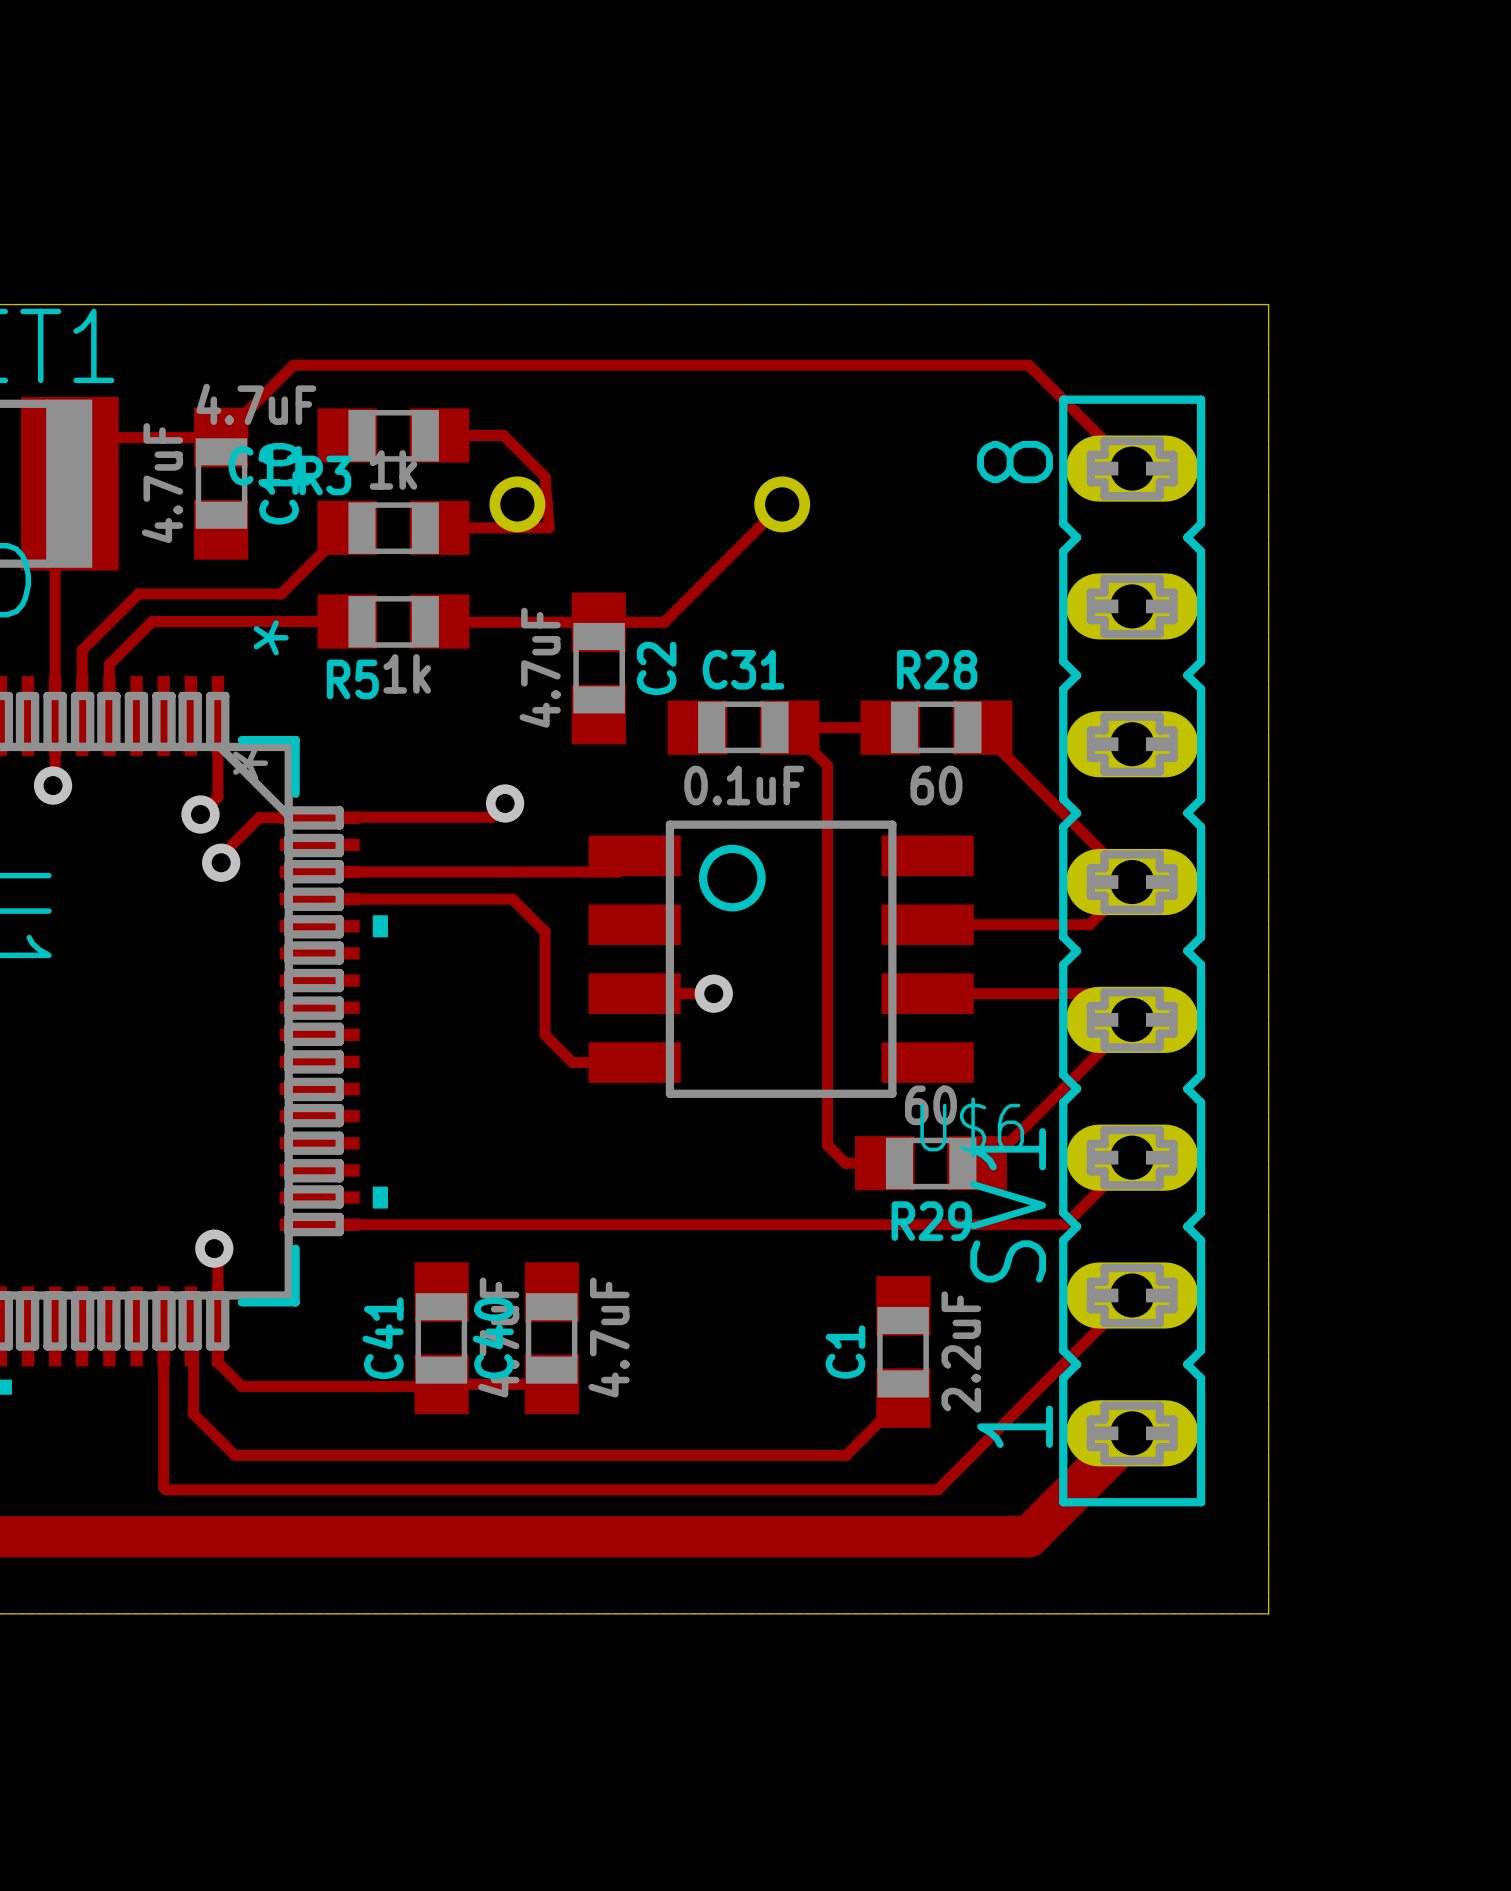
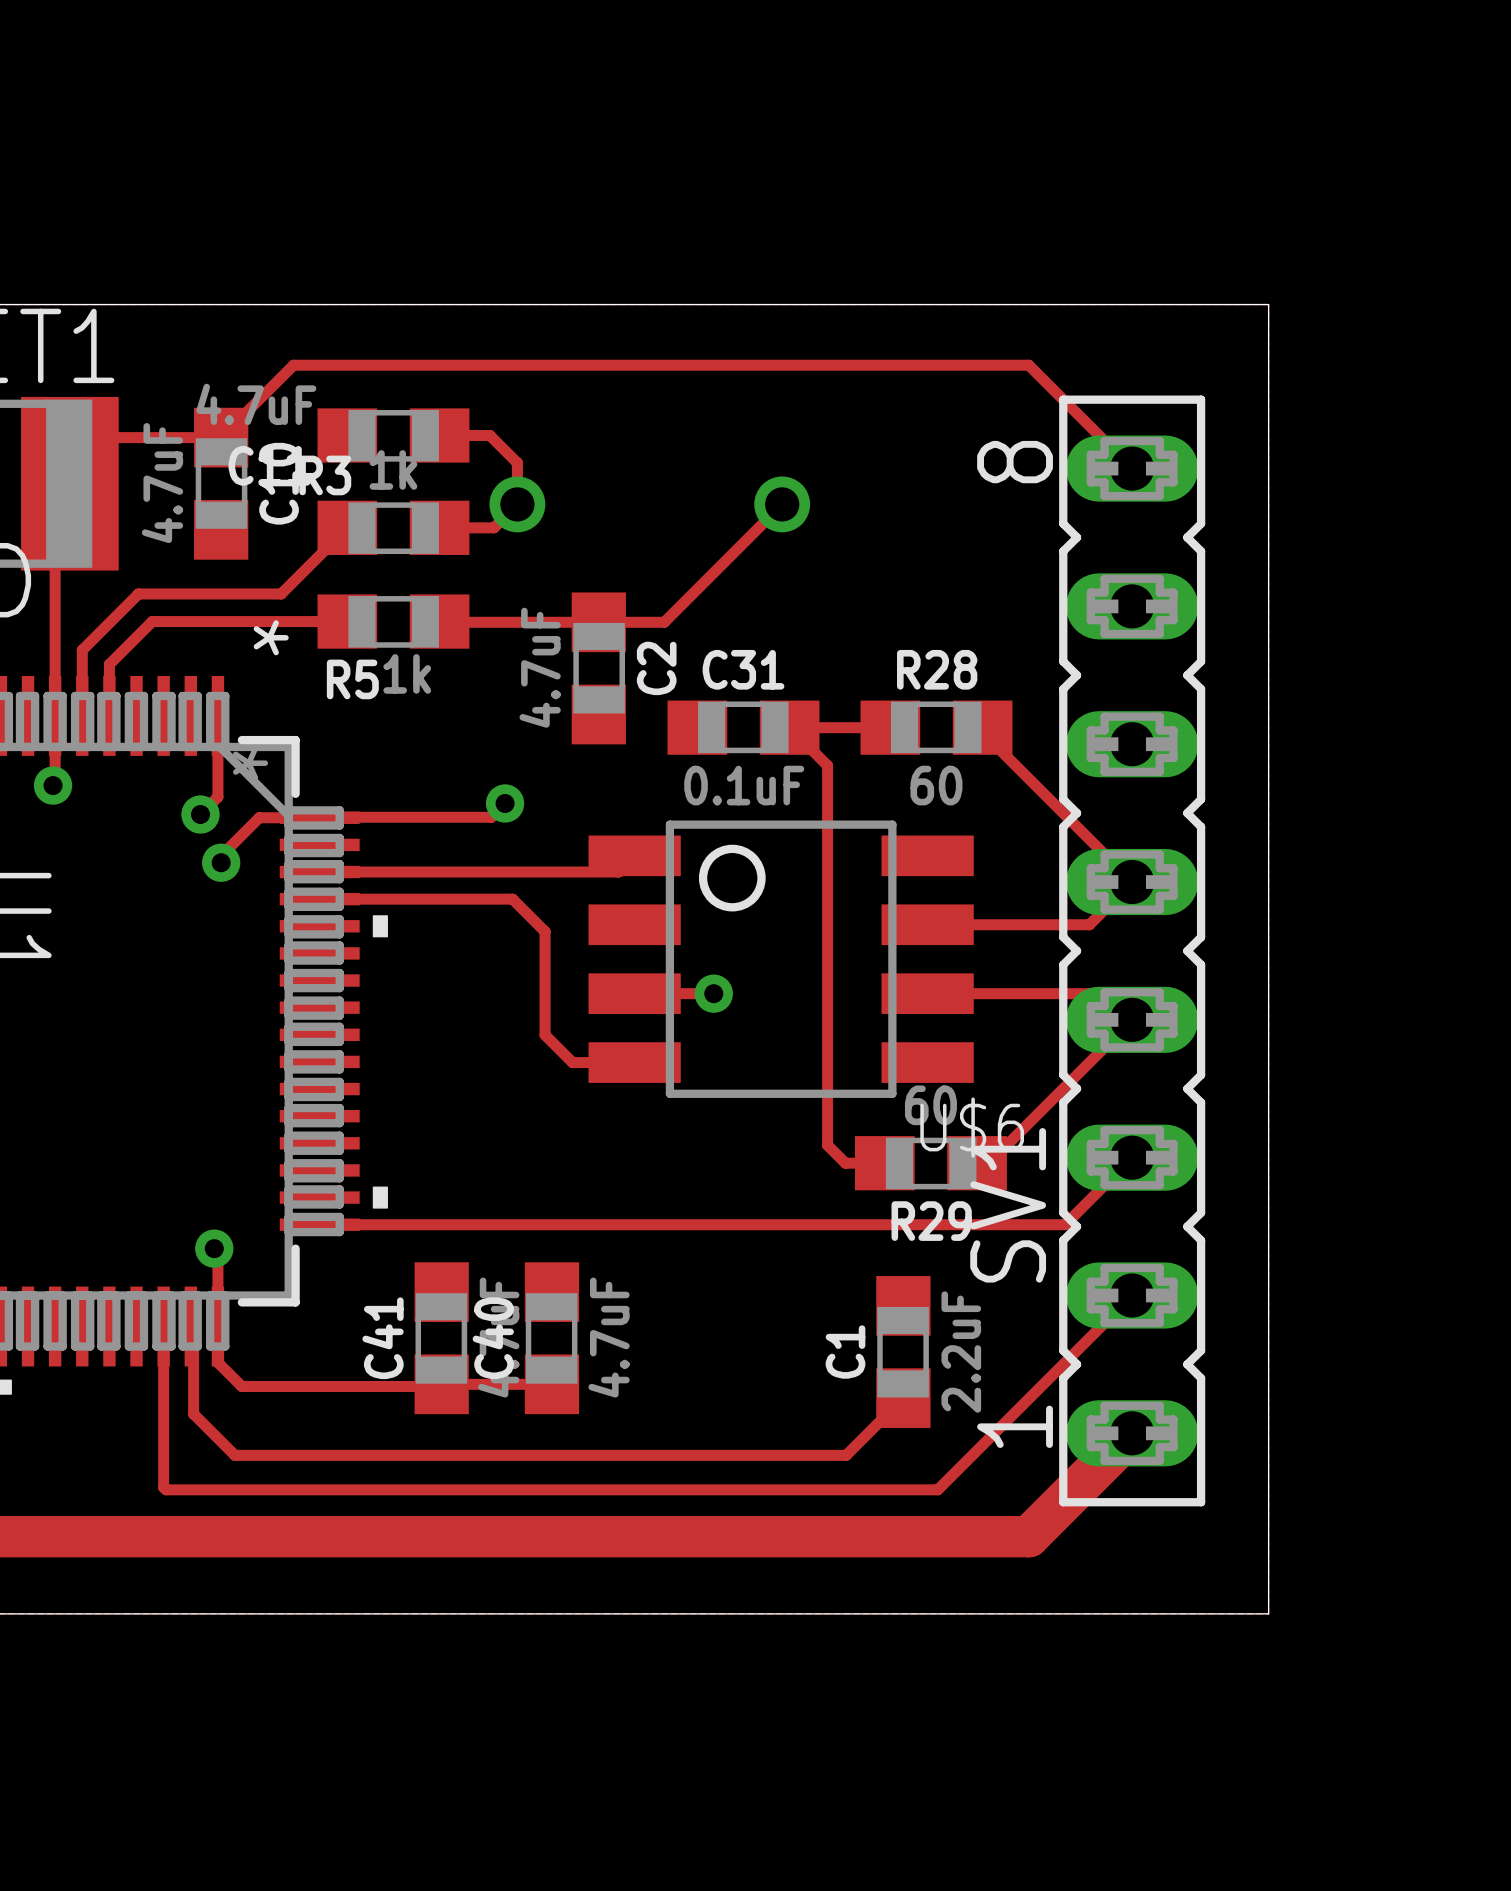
track: (489, 435) (503, 435) (544, 476) (549, 527) (493, 527) -> (489, 435) (517, 462) (517, 504) (493, 527)

